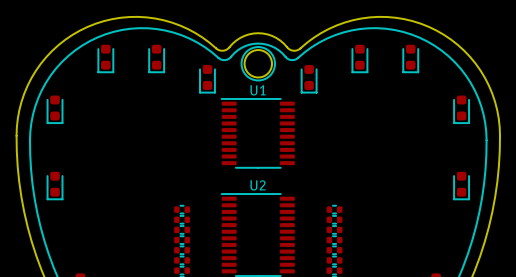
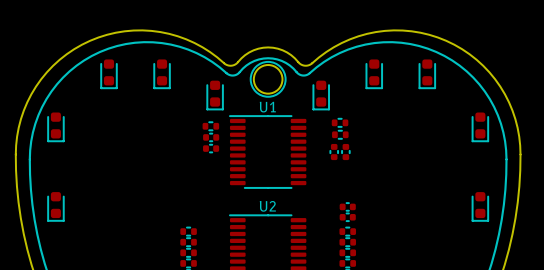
part: none -> (340, 122)
part: none -> (210, 126)
part: none -> (340, 134)
part: none -> (211, 137)
part: none -> (211, 148)
part: none -> (334, 152)
part: none -> (345, 152)
part: none -> (347, 206)
part: none -> (347, 217)

